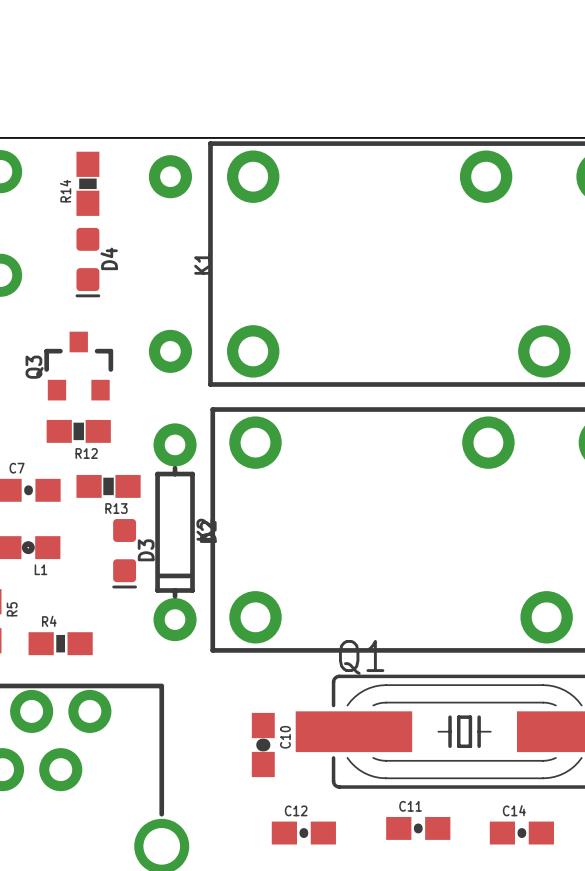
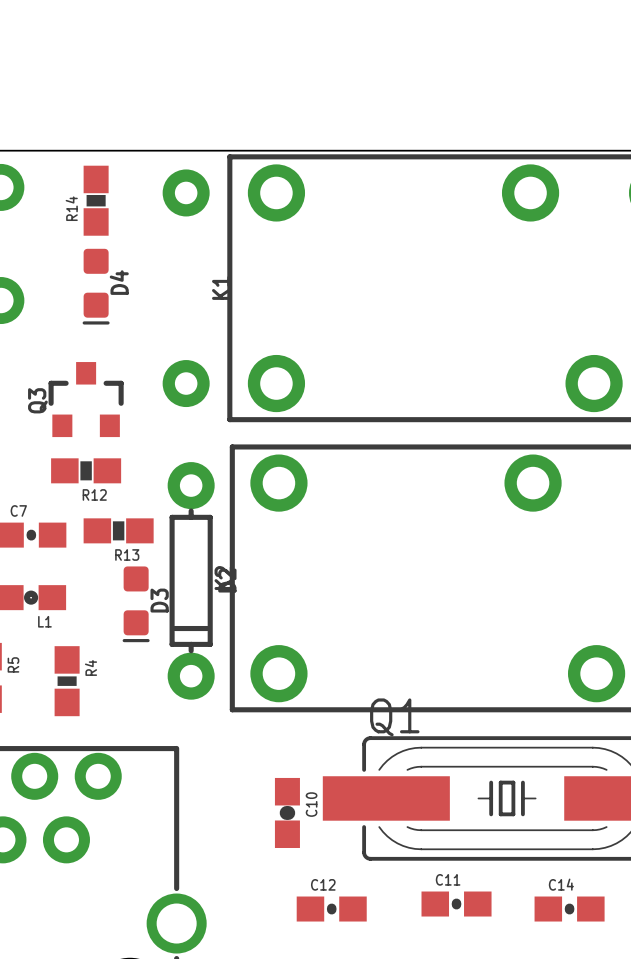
R4 rotation: 0° (60, 643) -> 90° clockwise (67, 681)

